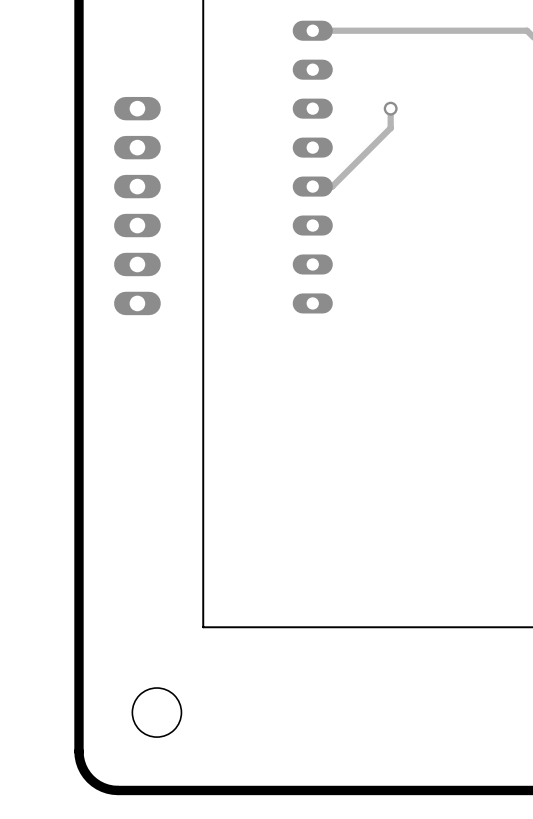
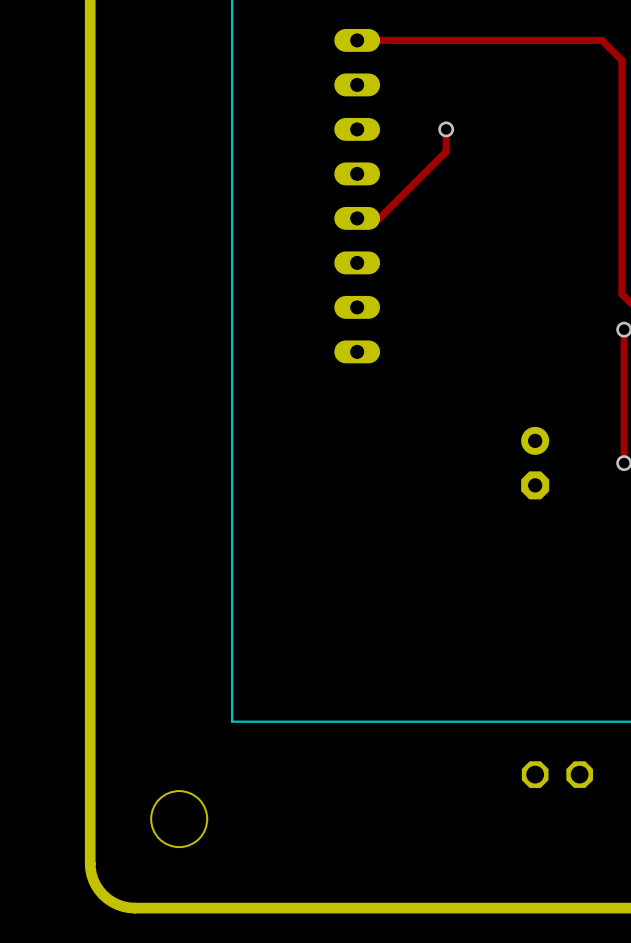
part: (137, 206) -> none
part: none -> (535, 463)
part: none -> (535, 774)
part: none -> (579, 774)

